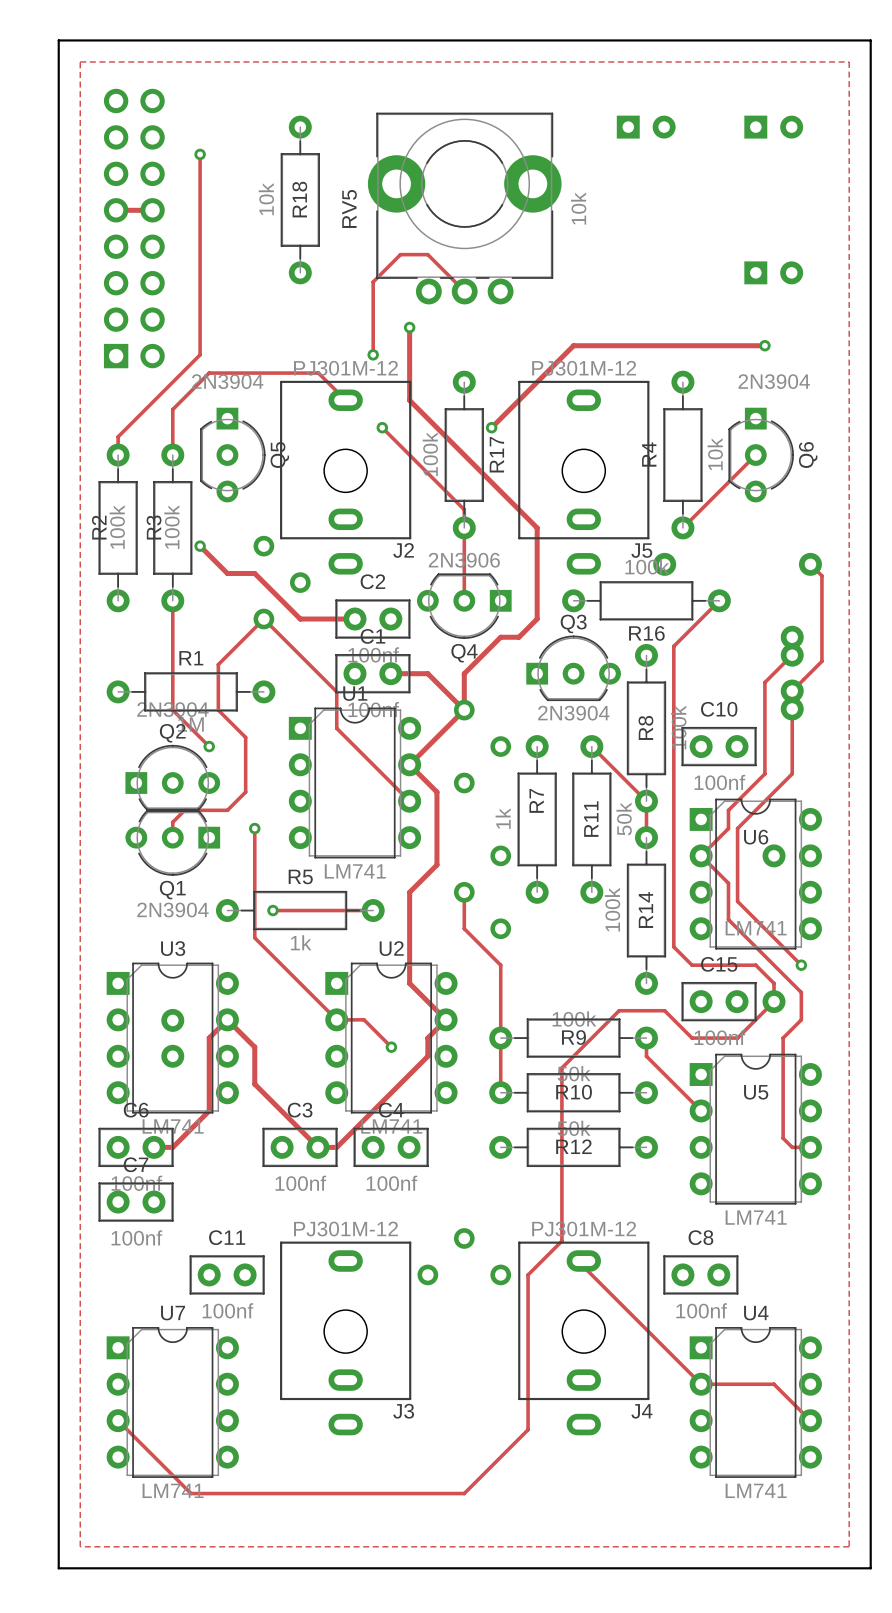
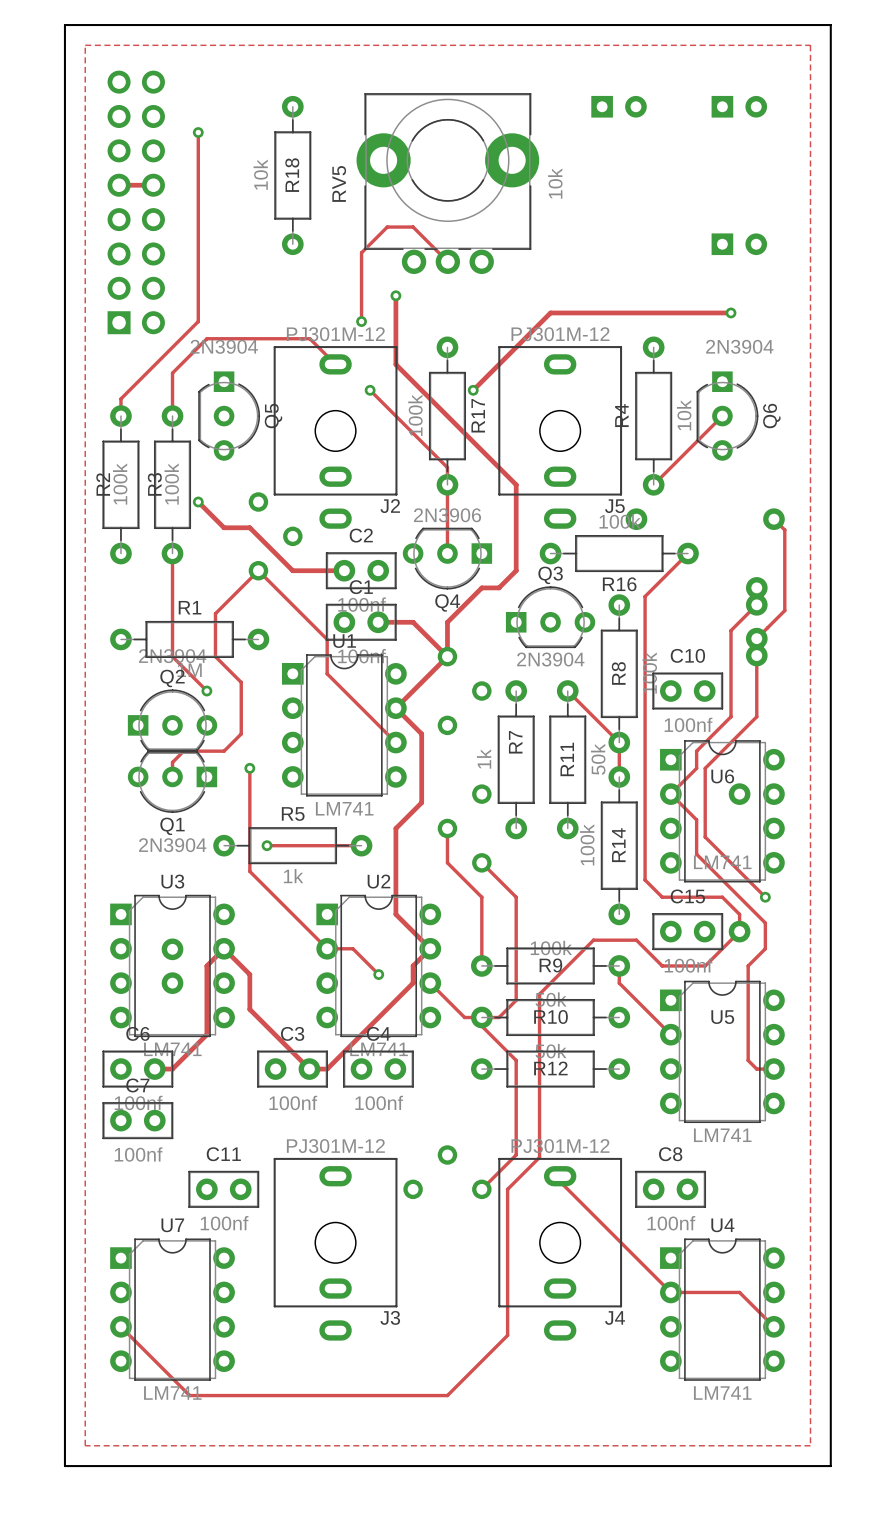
track: none -> (481, 862) (516, 897) (516, 1000) (499, 1017) (464, 1017) (430, 983)
track: (500, 1038) (500, 1092) -> none
track: none -> (481, 1026) (516, 1060) (516, 1154) (481, 1189)

